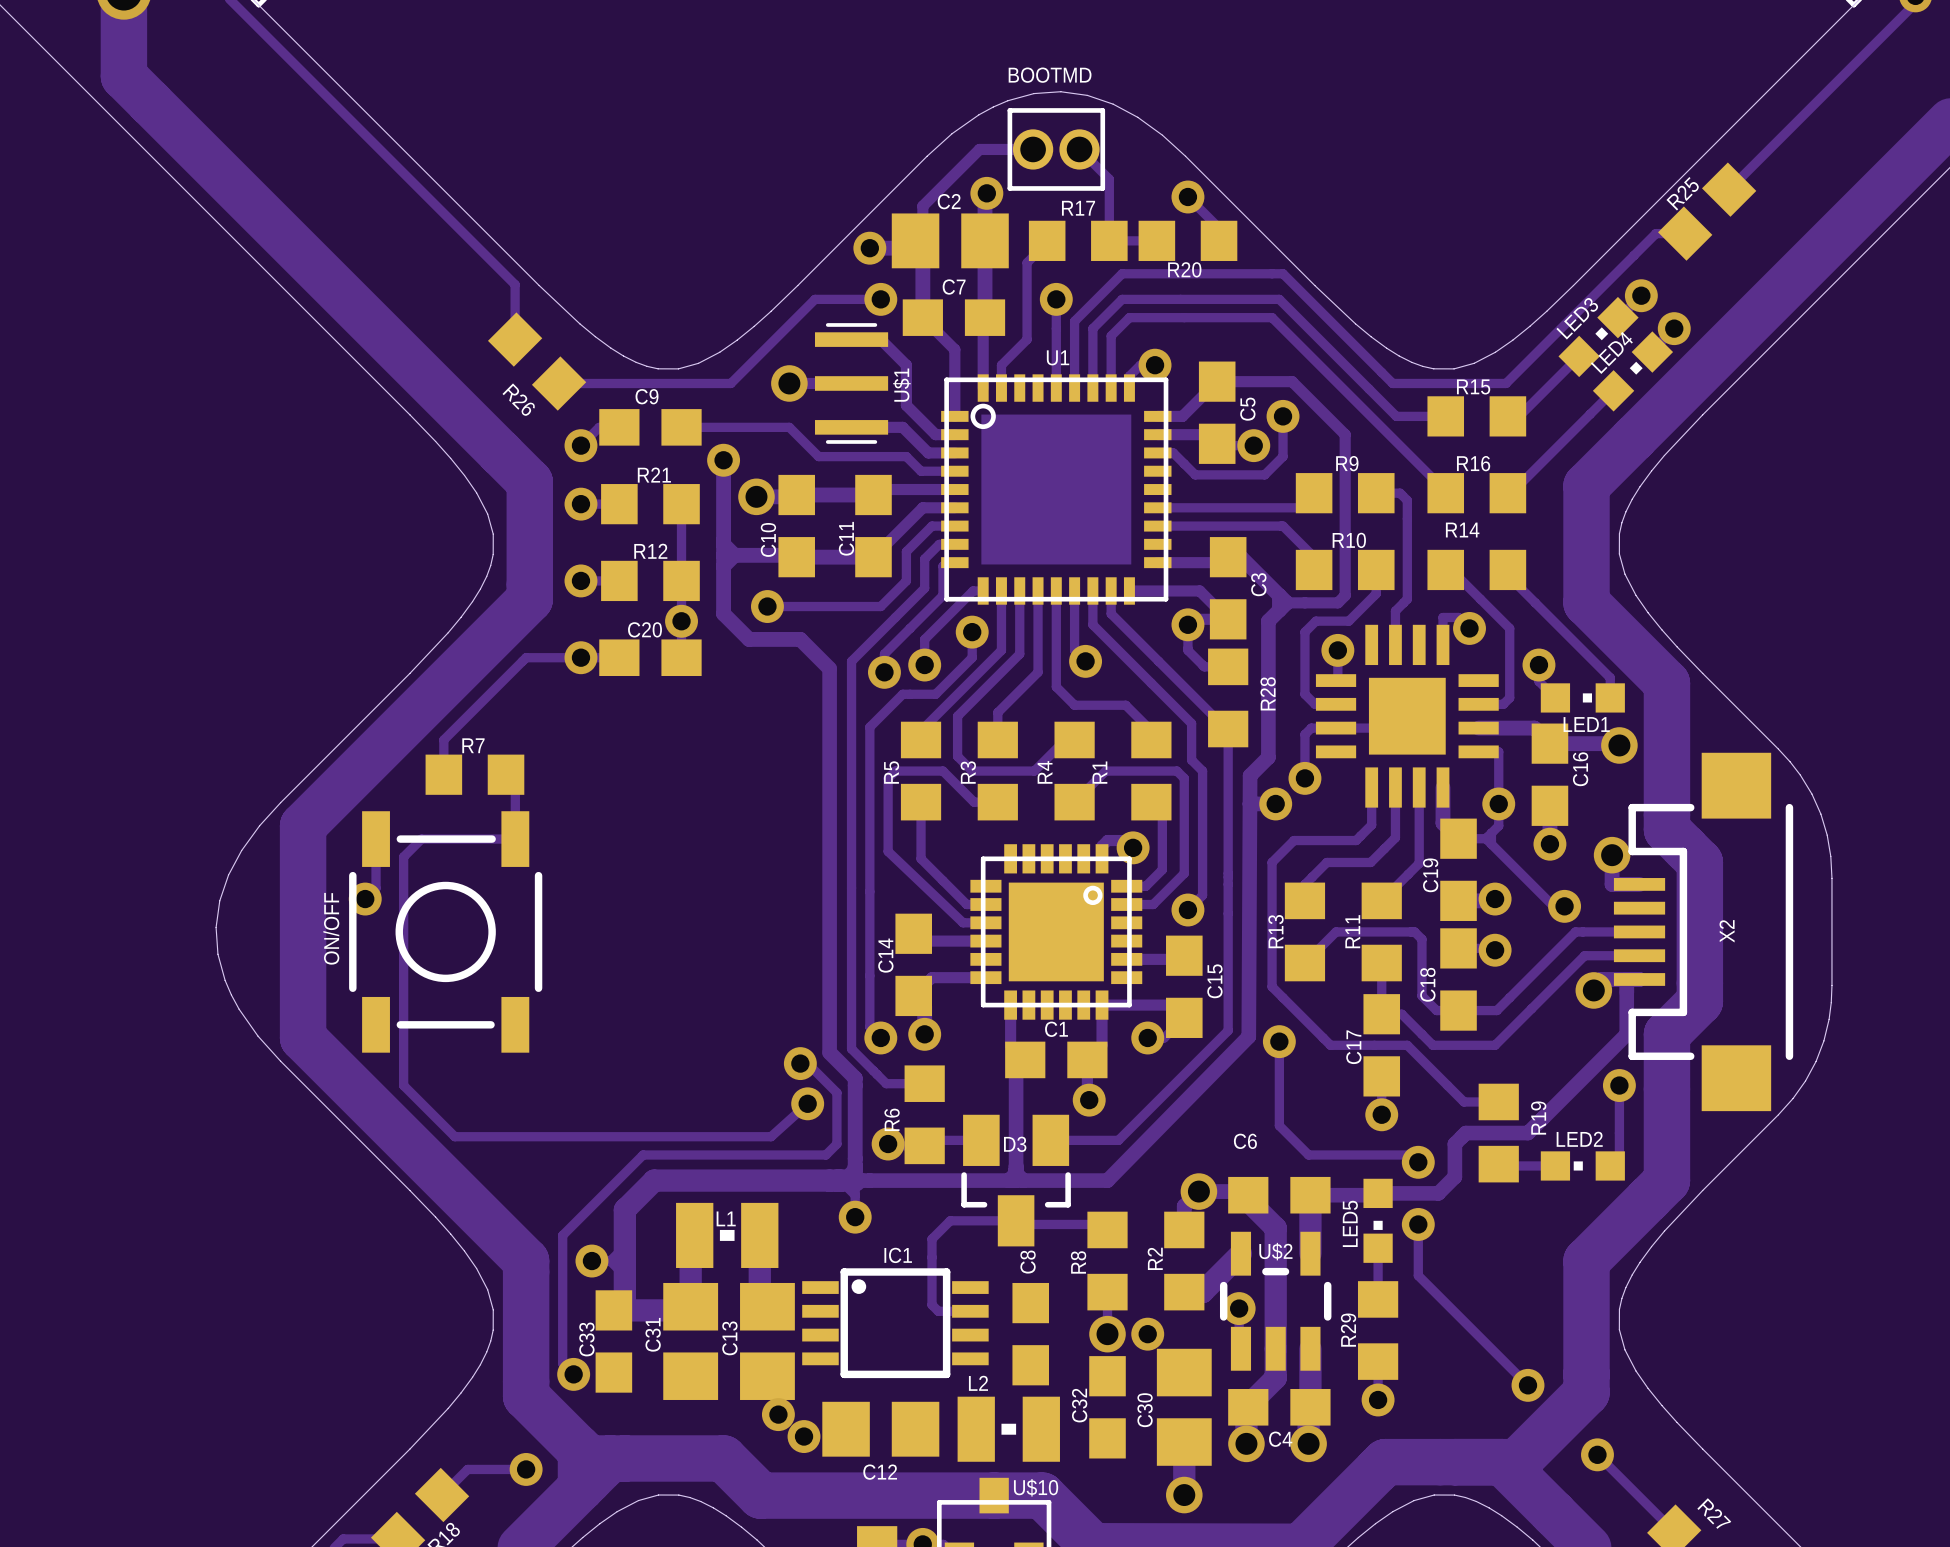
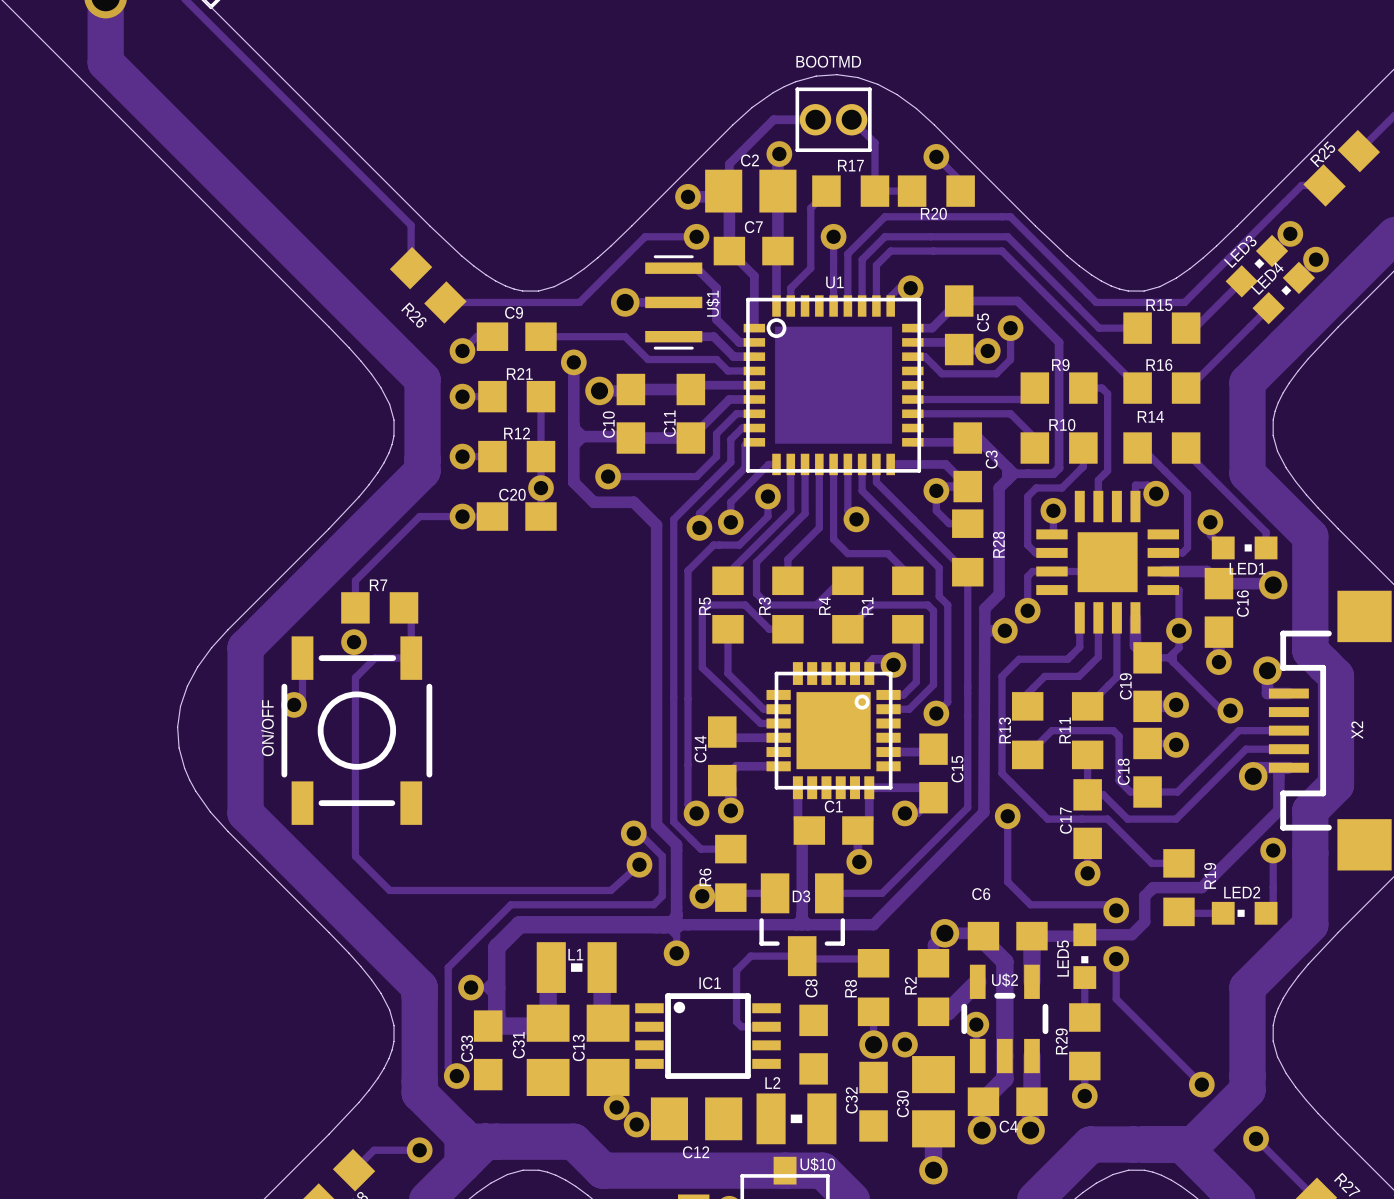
via: none -> (354, 642)
track: (469, 839) (421, 839) (403, 856) (403, 1085) (454, 1136) (487, 1136) -> (375, 658) (355, 677) (355, 856) (389, 890)

